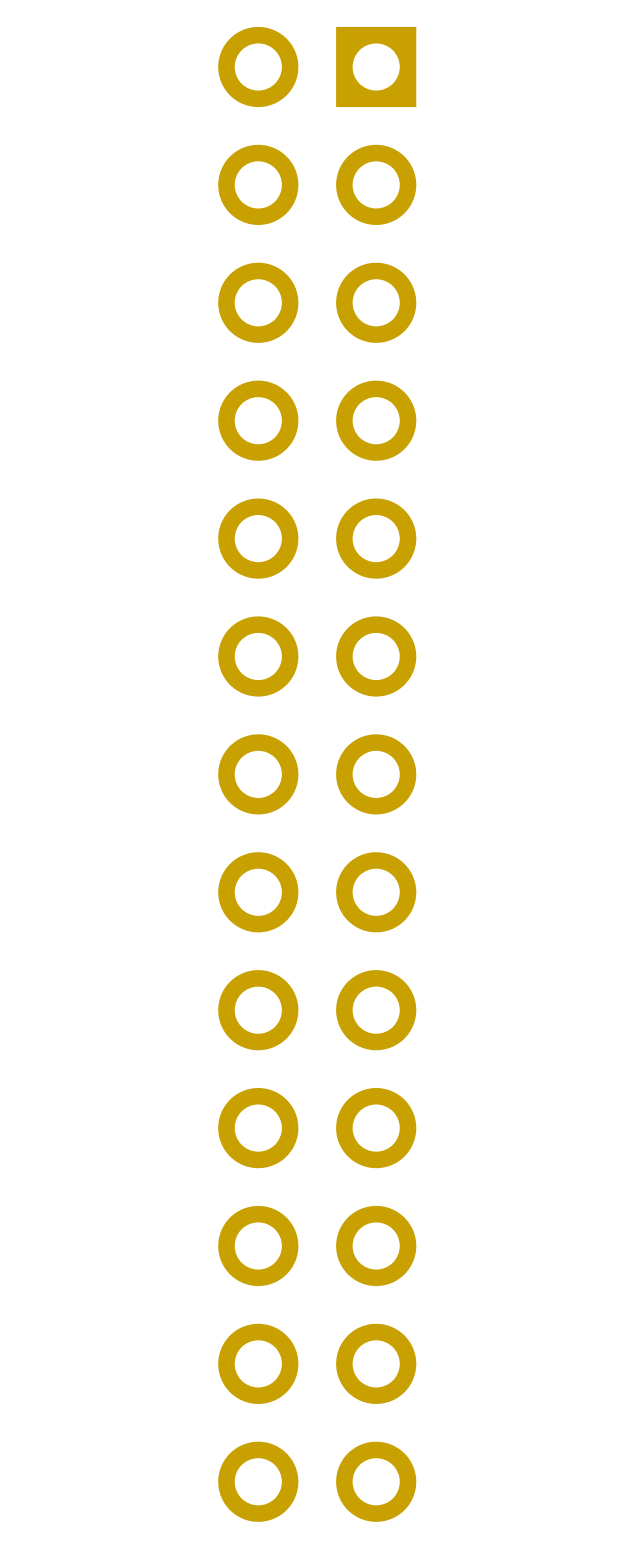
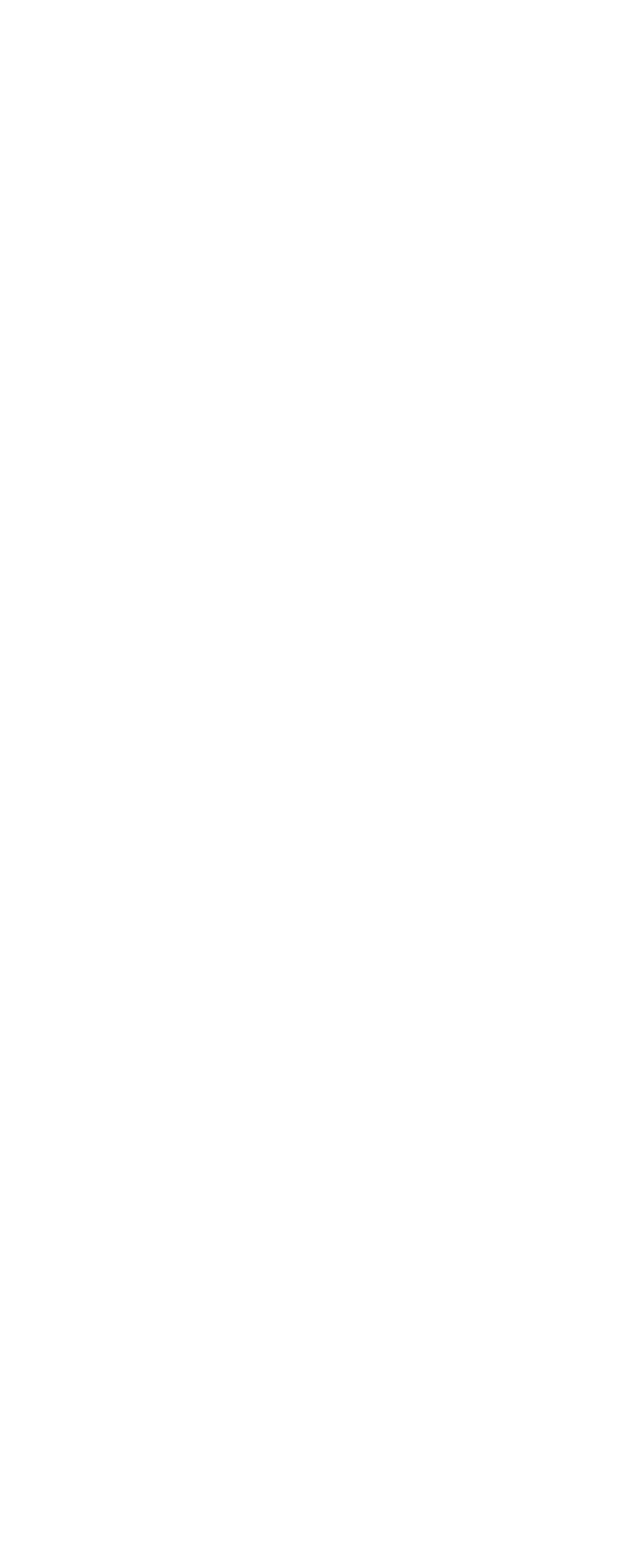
part: (317, 774) -> none

